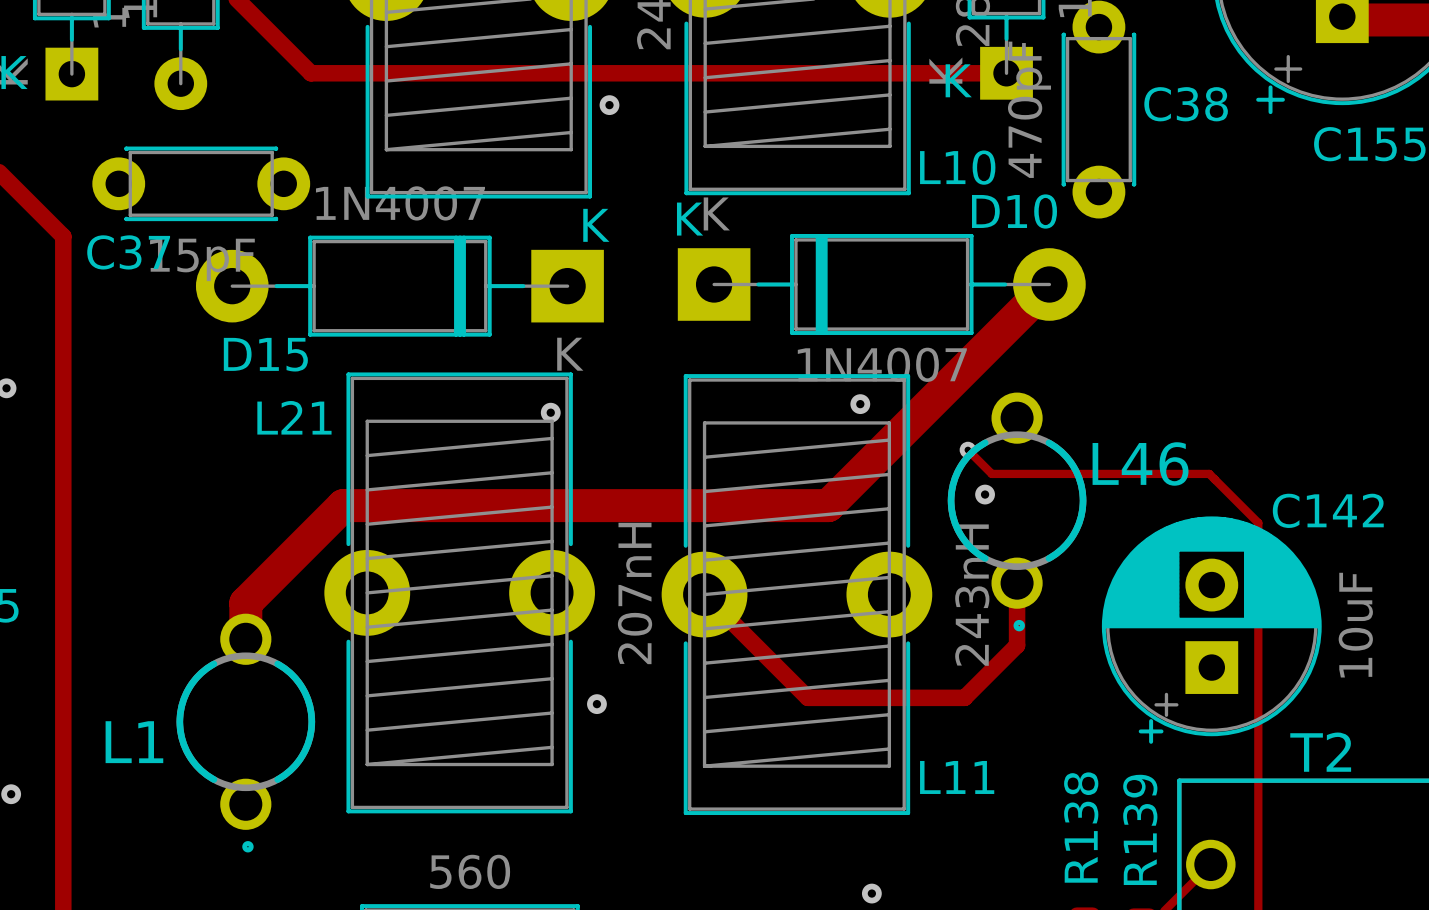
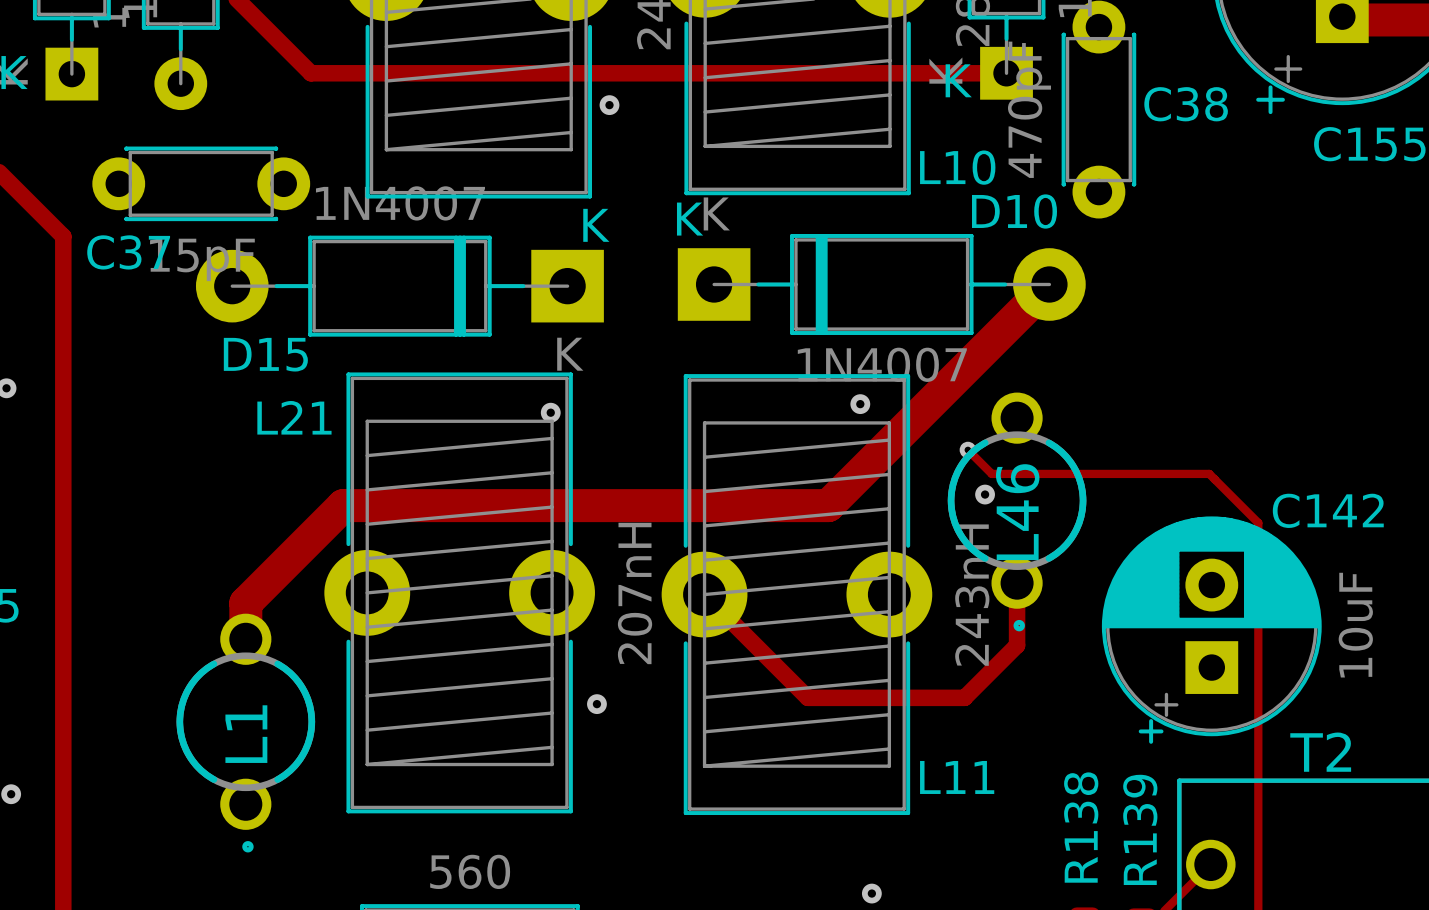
L46 name rotation: 0° (1140, 463) -> 90° counterclockwise (1017, 512)
L1 name rotation: 0° (134, 742) -> 90° counterclockwise (246, 734)
L1 name position: L1 (134, 742) -> L1 (246, 734)

